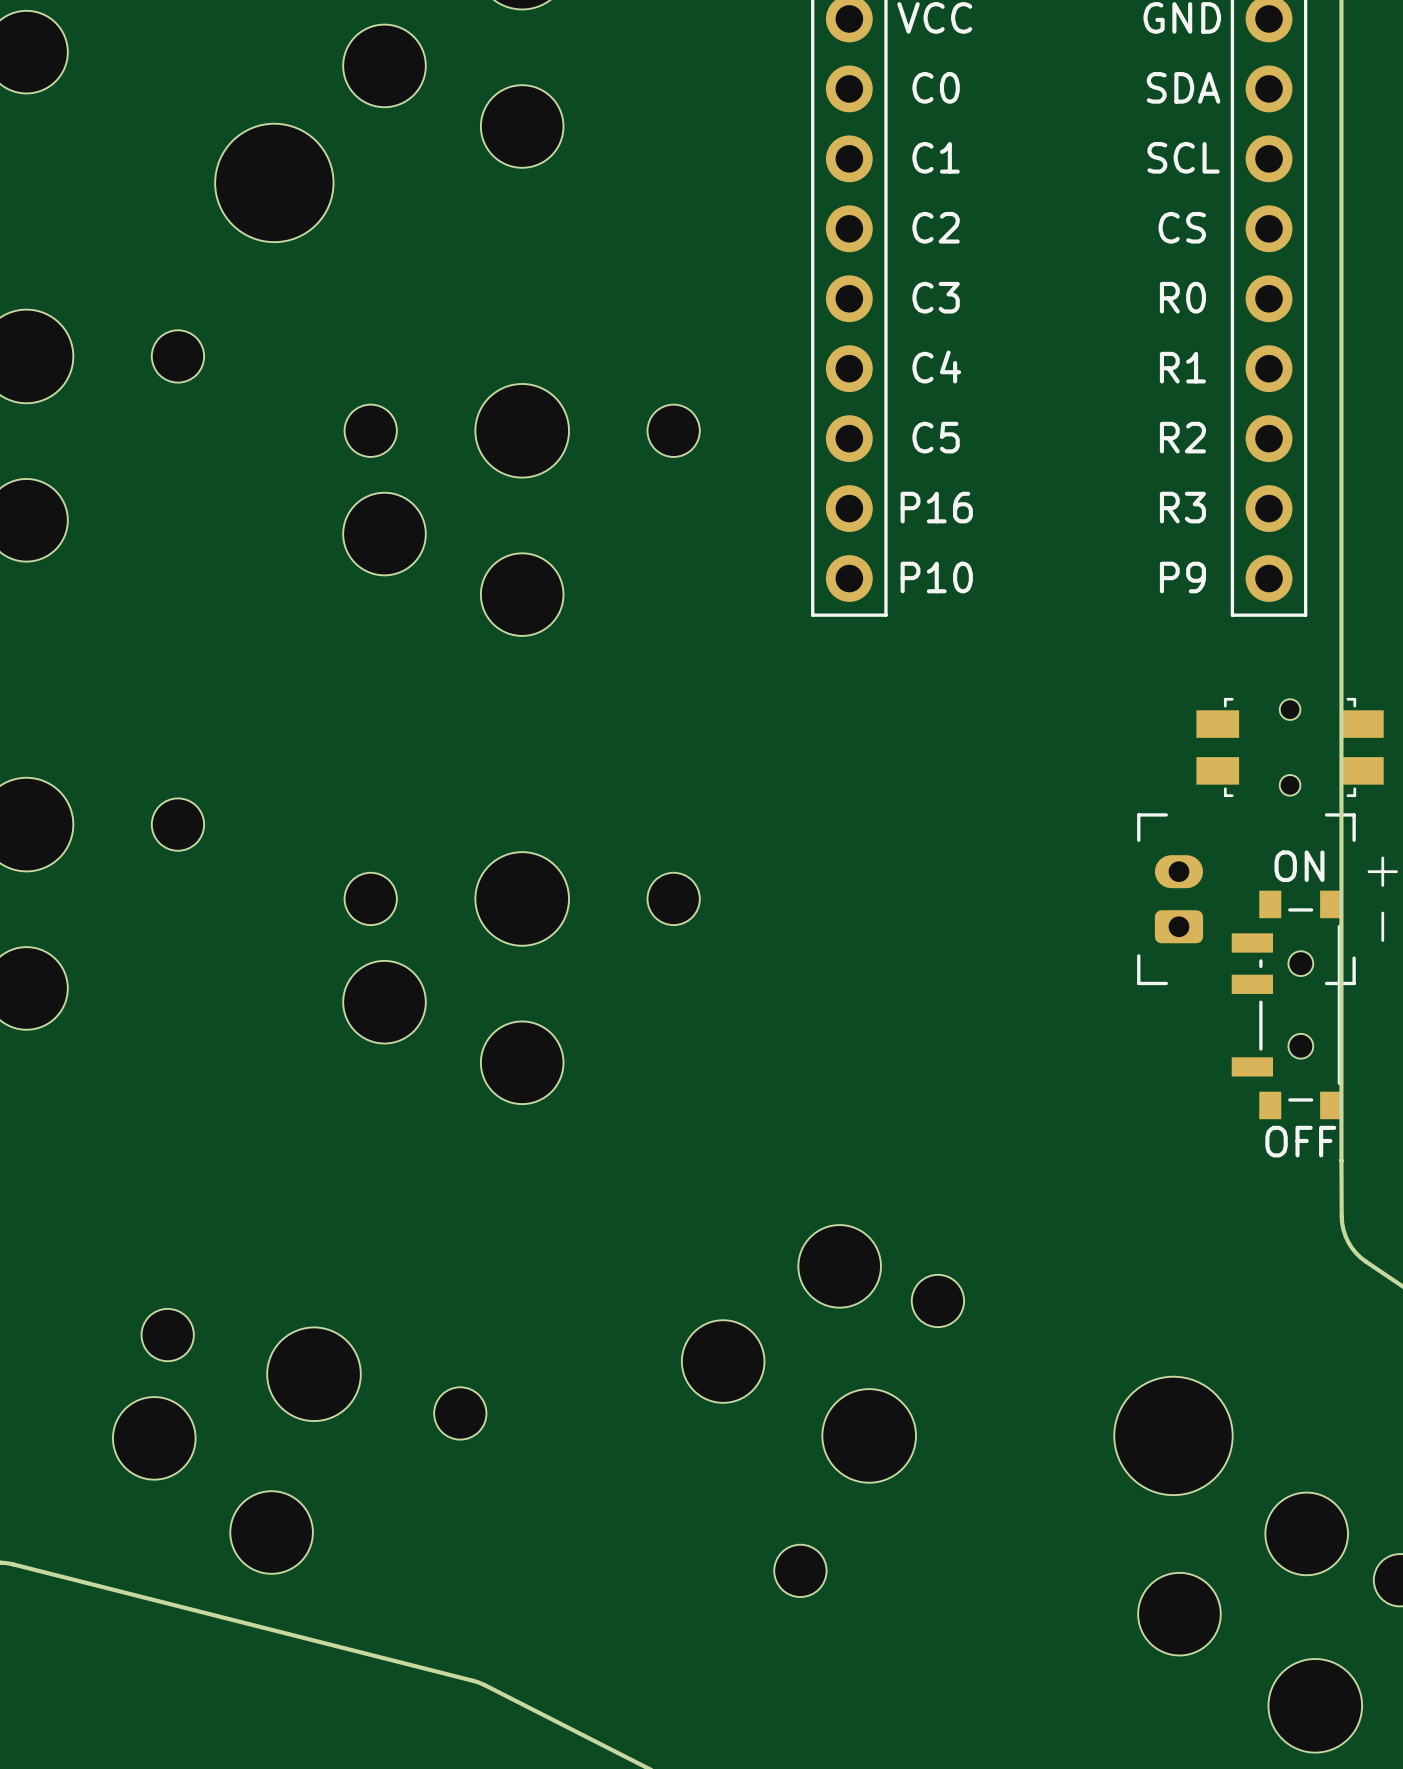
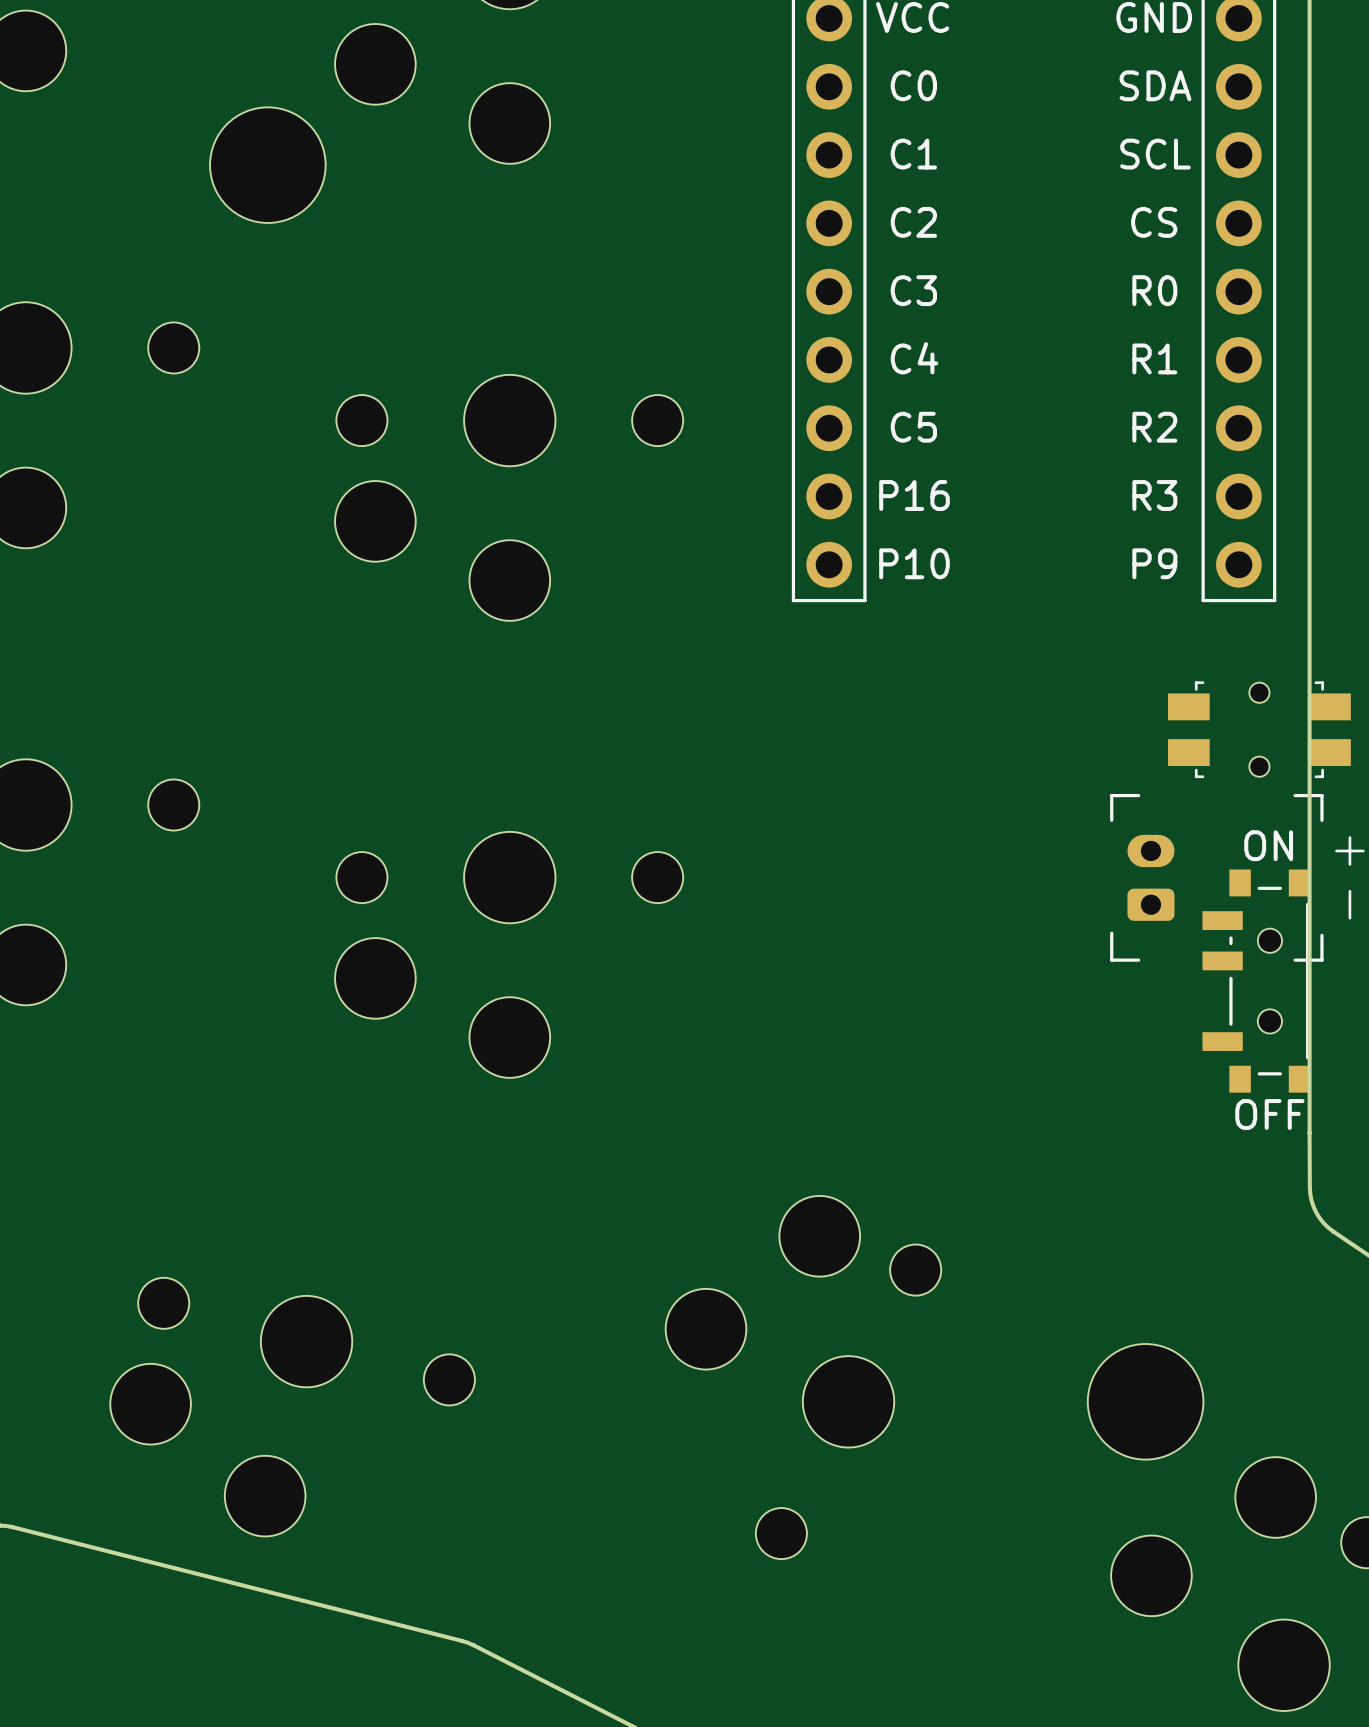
part position: (274, 182) -> (267, 165)

